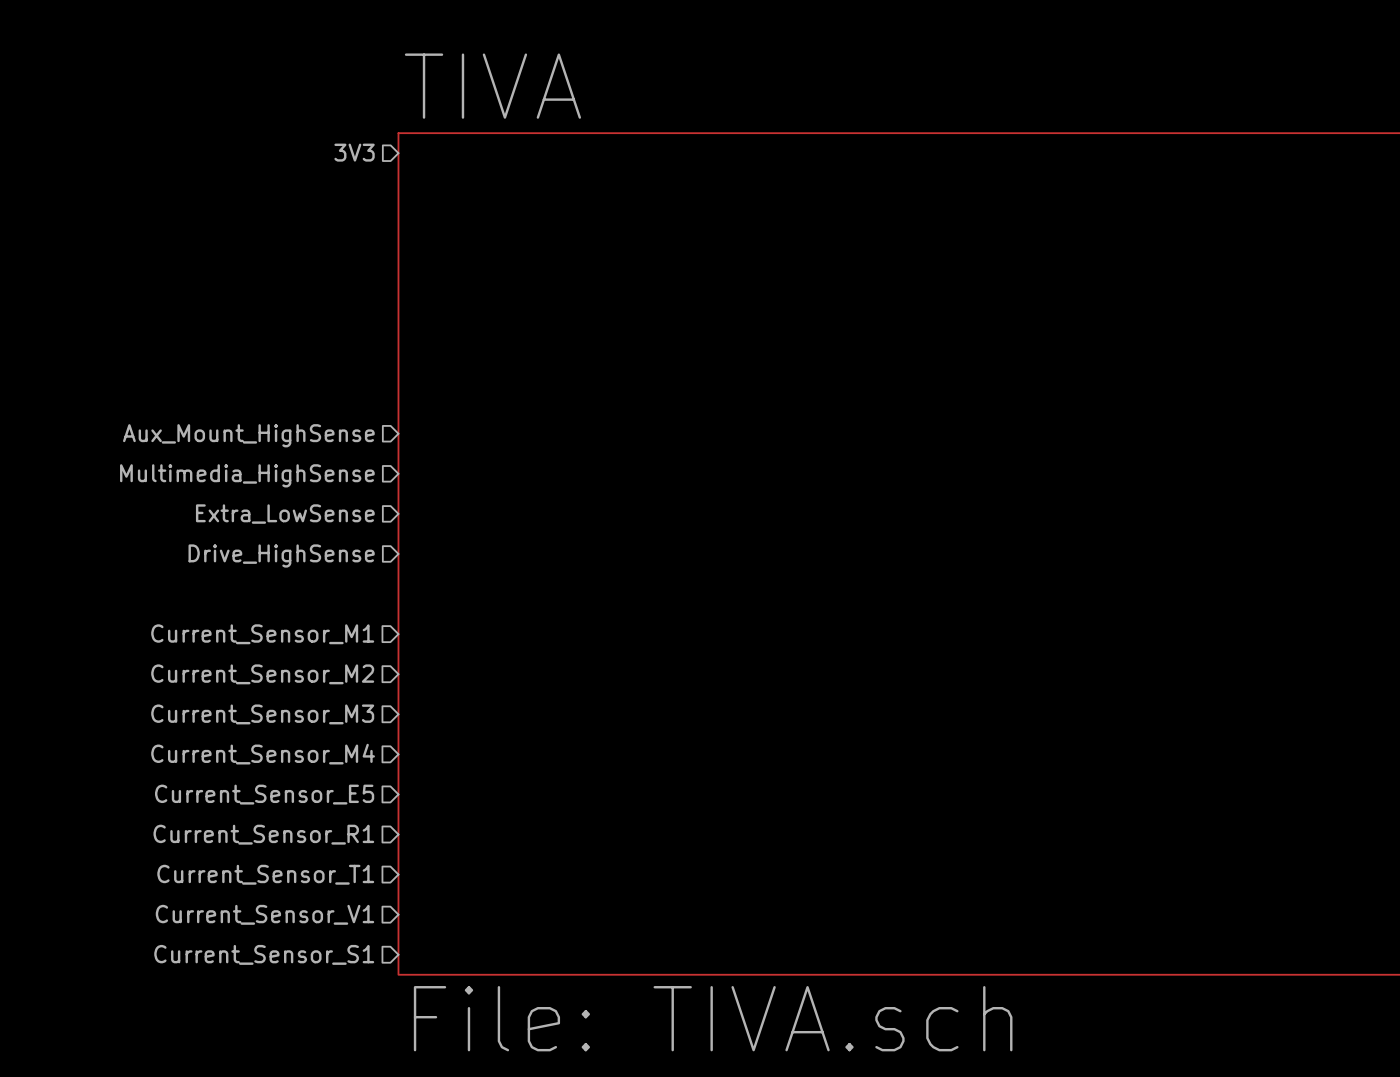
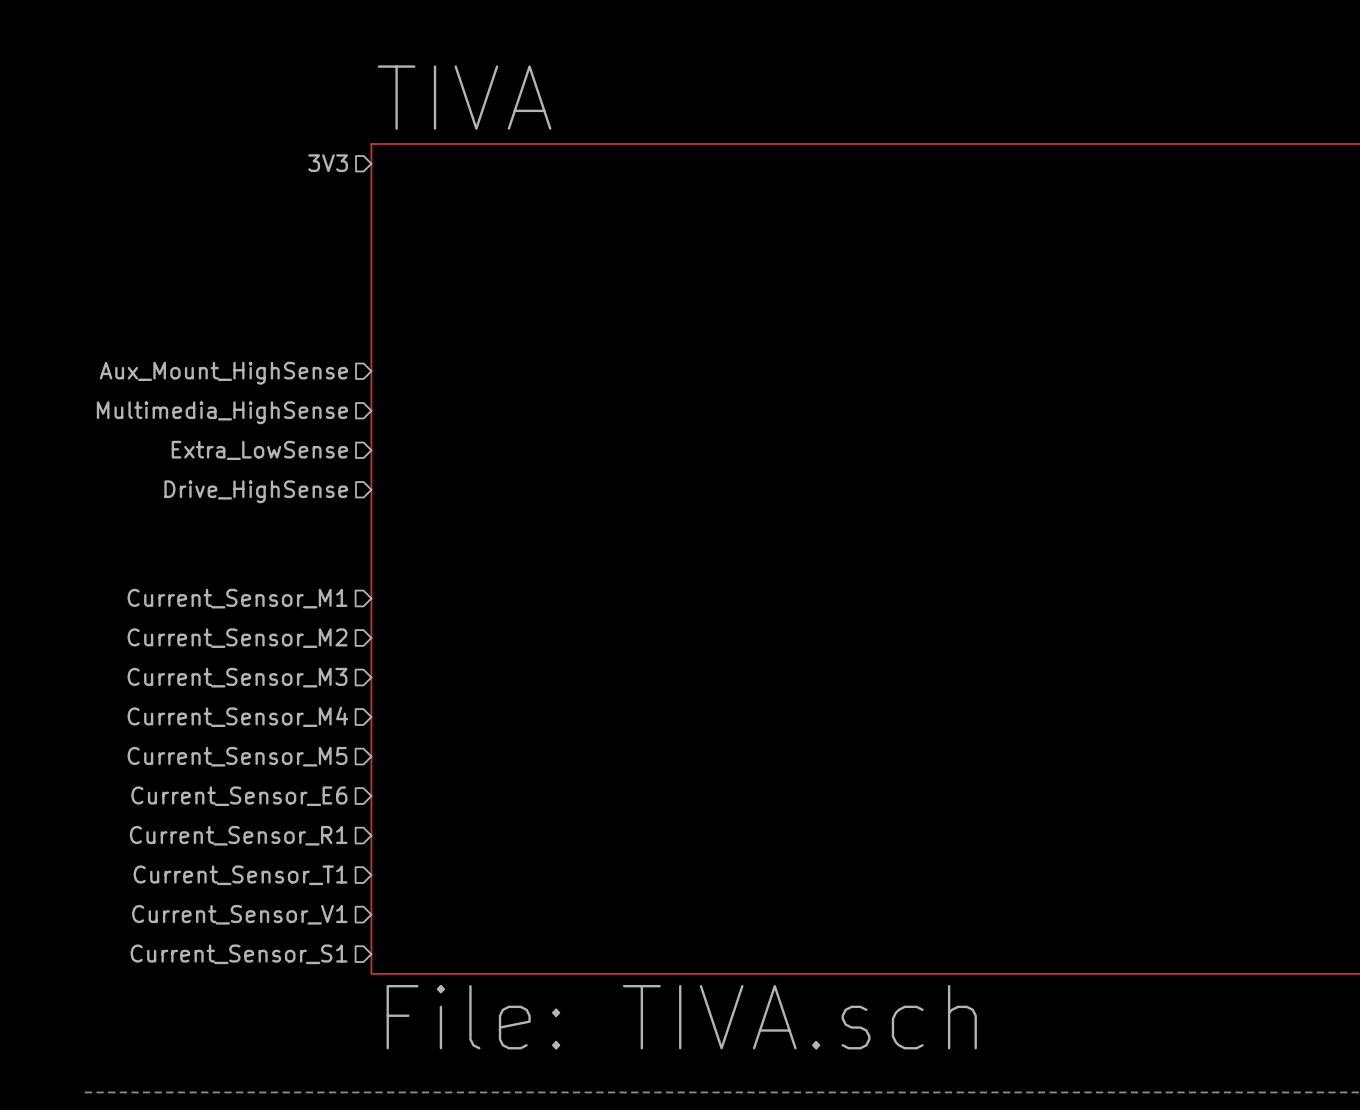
hierarchical label: none -> Aux_Mount_HighSense (223, 373)
hierarchical label: none -> Multimedia_HighSense (222, 412)
hierarchical label: Aux_Mount_HighSense (248, 435) -> Extra_LowSense (259, 450)
hierarchical label: Multimedia_HighSense (247, 475) -> Drive_HighSense (256, 491)
hierarchical label: Extra_LowSense (285, 514) -> none
hierarchical label: Drive_HighSense (281, 555) -> none
hierarchical label: none -> Current_Sensor_M1 (237, 598)
hierarchical label: Current_Sensor_M1 (262, 634) -> Current_Sensor_M2 (237, 638)
hierarchical label: Current_Sensor_M2 (262, 674) -> Current_Sensor_M3 (237, 677)
hierarchical label: Current_Sensor_M3 (262, 714) -> Current_Sensor_M4 (237, 716)
hierarchical label: Current_Sensor_M4 (263, 754) -> Current_Sensor_M5 (237, 756)
hierarchical label: Current_Sensor_E5 (264, 794) -> Current_Sensor_E6 (239, 796)

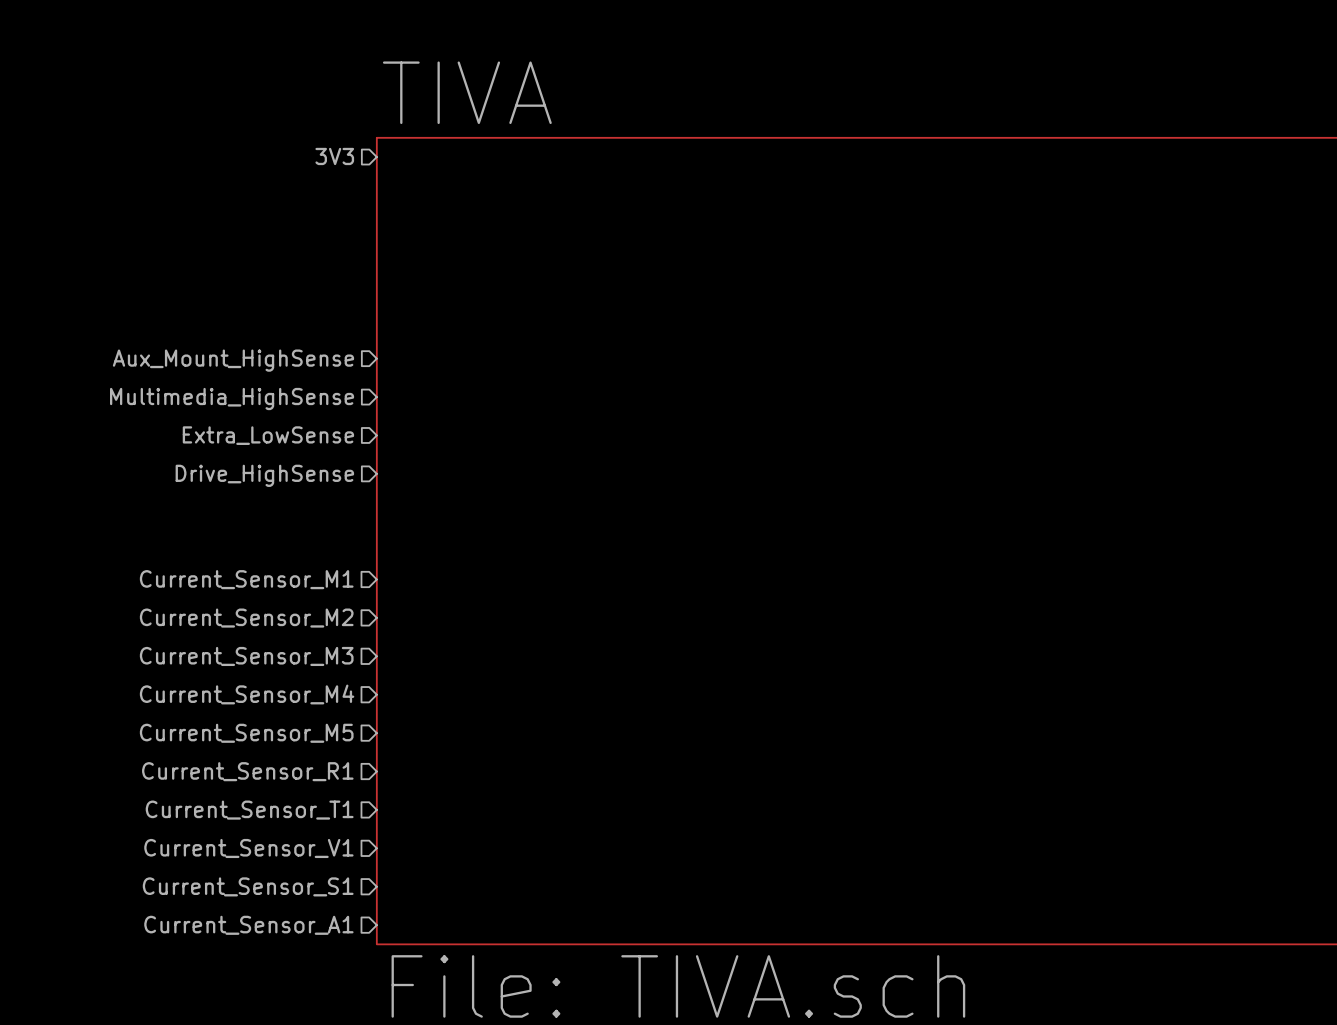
hierarchical label: Current_Sensor_E6 (239, 796) -> Current_Sensor_R1 (247, 771)
hierarchical label: Current_Sensor_R1 (238, 835) -> Current_Sensor_T1 (249, 810)
hierarchical label: Current_Sensor_T1 (240, 875) -> Current_Sensor_V1 (248, 848)
hierarchical label: Current_Sensor_V1 (239, 914) -> Current_Sensor_S1 (248, 886)
hierarchical label: Current_Sensor_S1 (239, 954) -> Current_Sensor_A1 (248, 925)

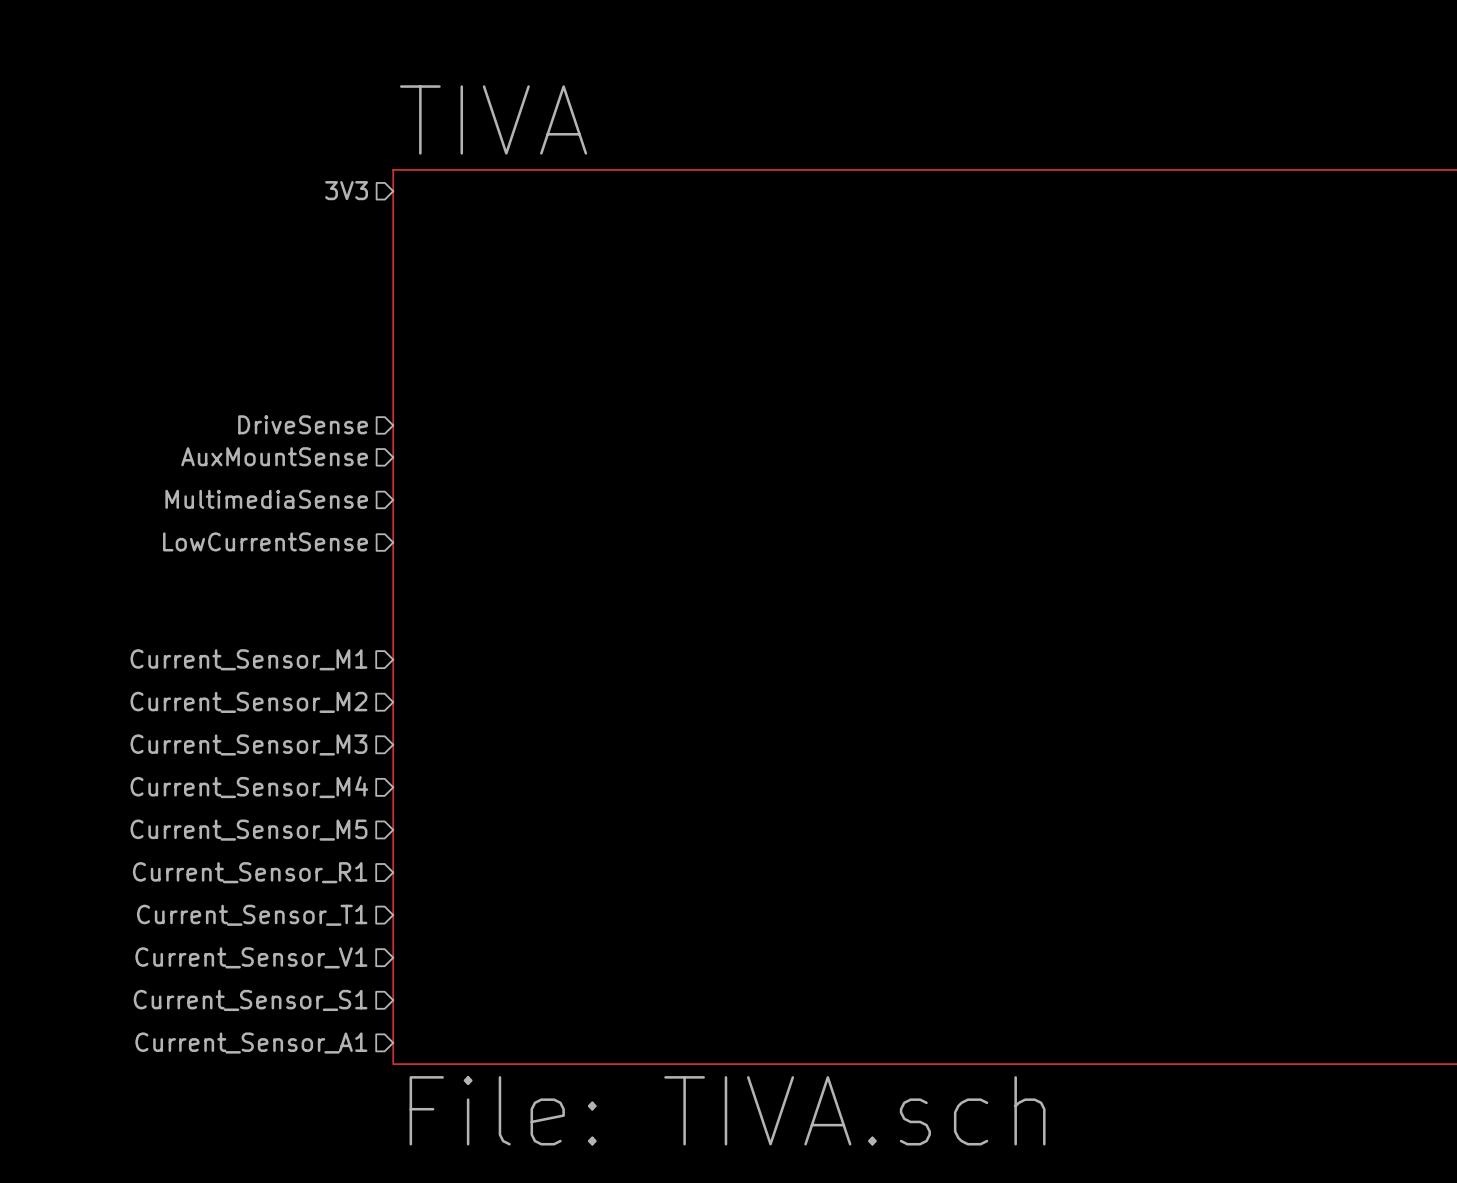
hierarchical label: Aux_Mount_HighSense (233, 360) -> DriveSense (303, 424)
hierarchical label: Multimedia_HighSense (232, 399) -> AuxMountSense (274, 456)
hierarchical label: Extra_LowSense (268, 435) -> MultimediaSense (266, 499)
hierarchical label: Drive_HighSense (264, 475) -> LowCurrentSense (265, 541)

